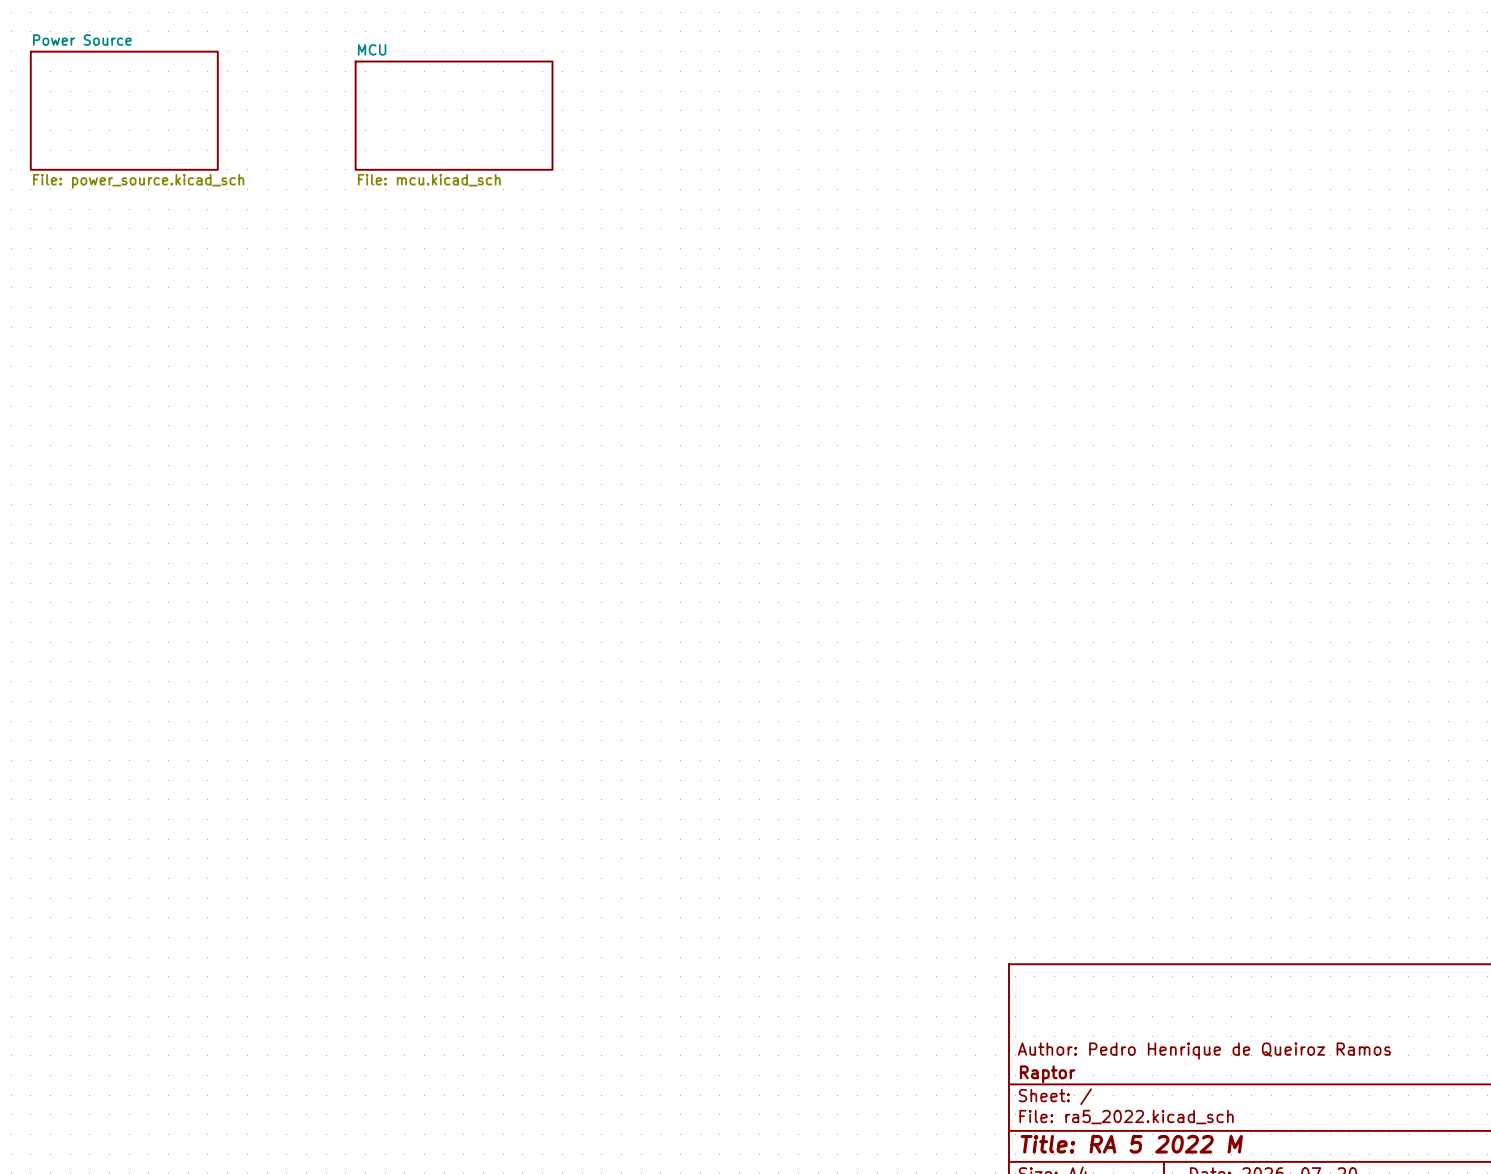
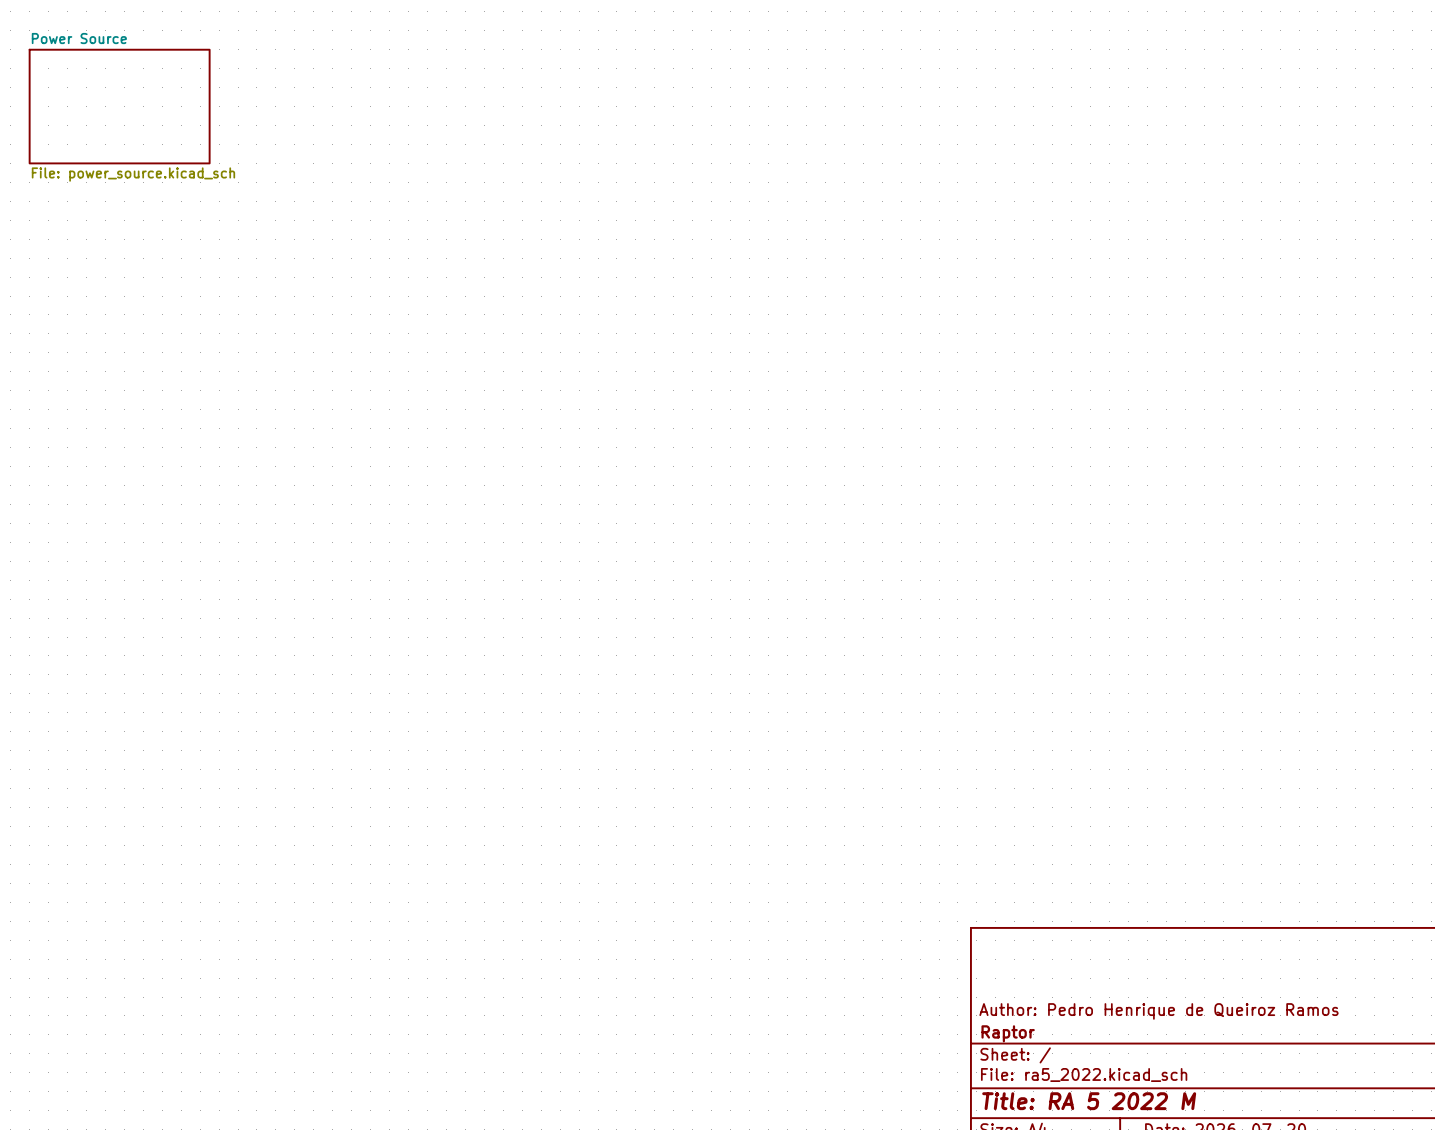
sheet MCU: File: mcu.kicad_sch (454, 115) -> none

